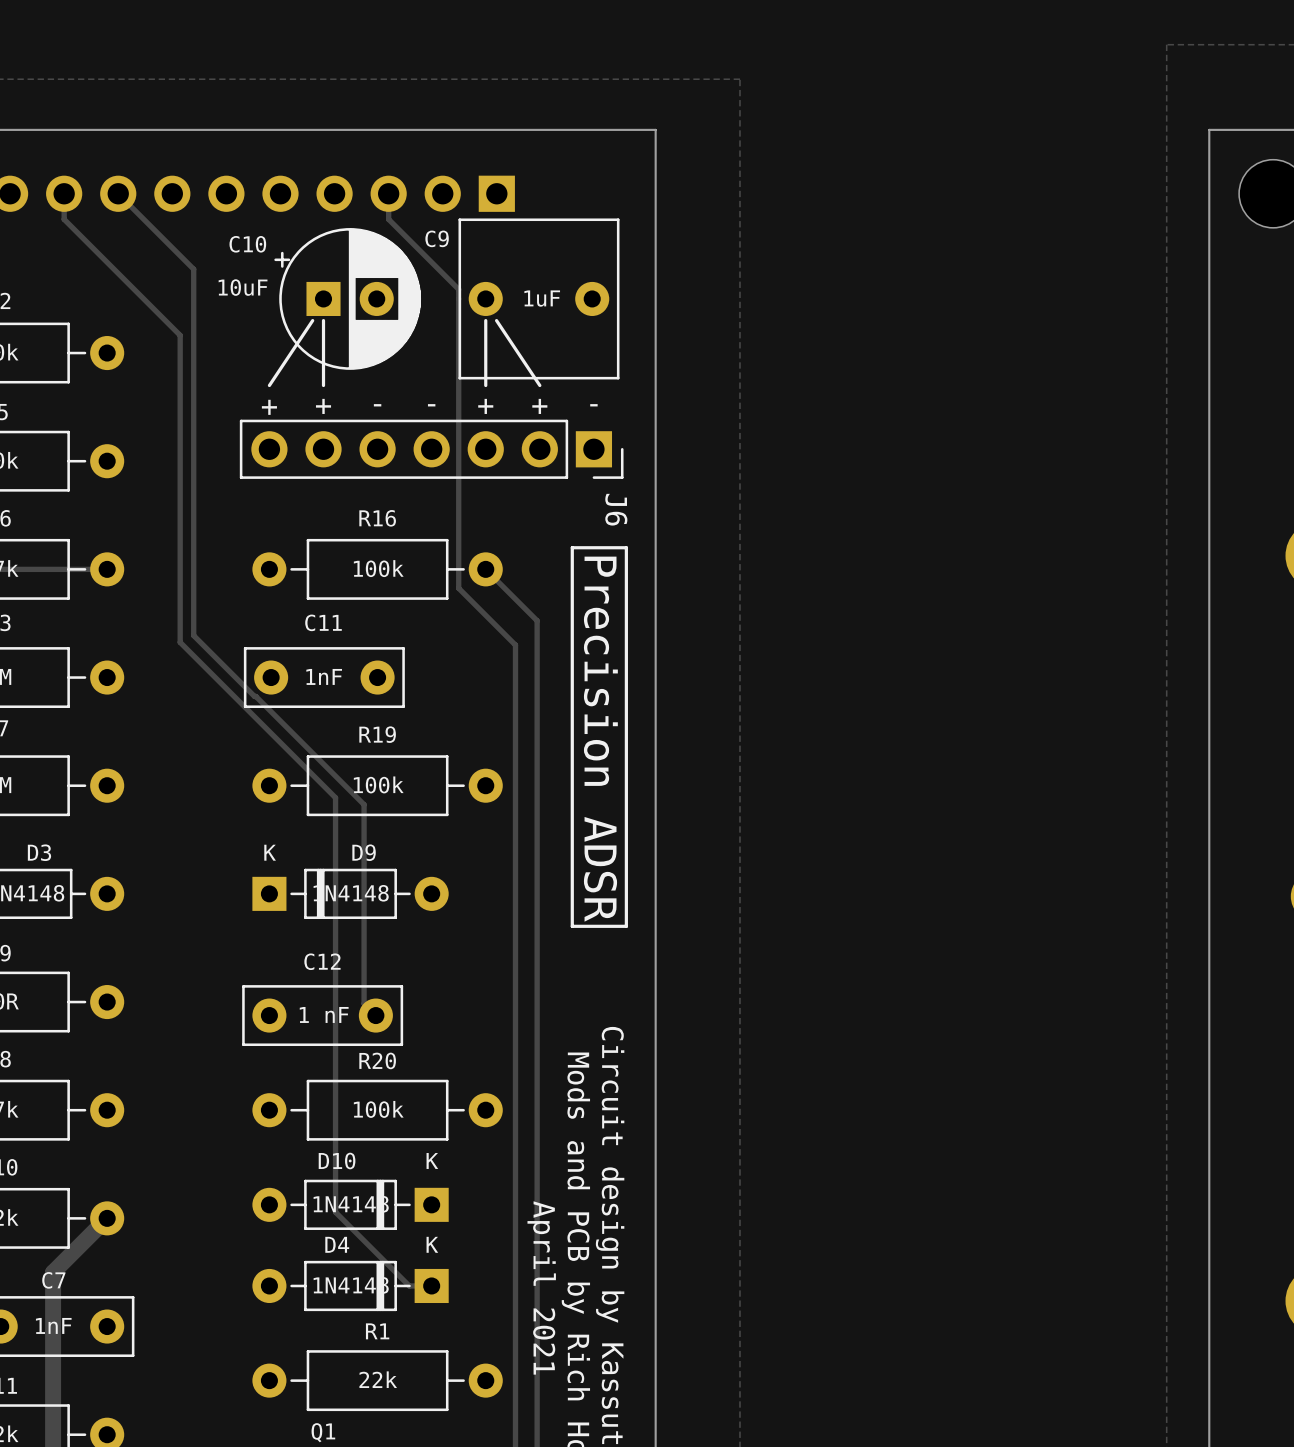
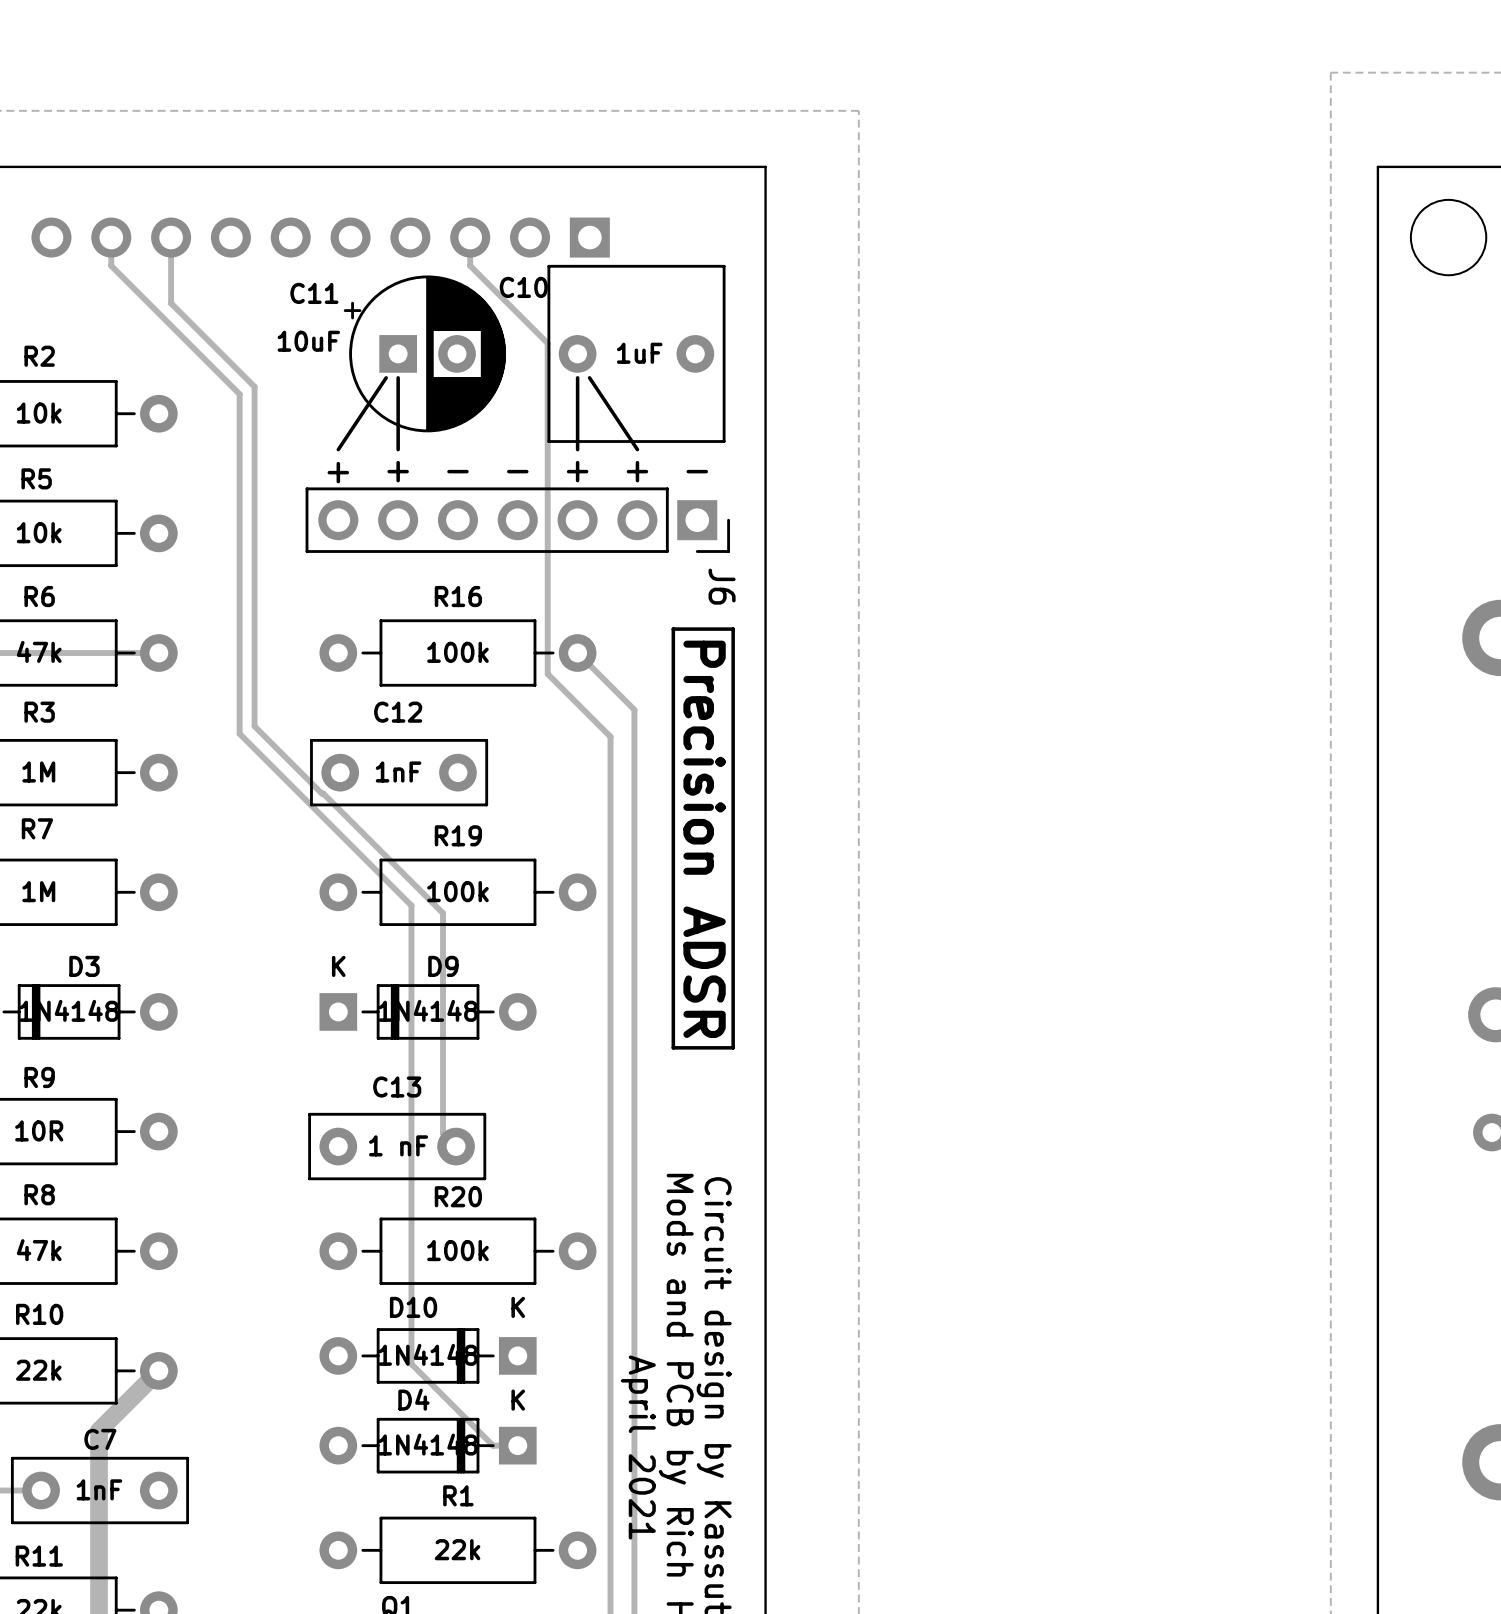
track: (118, 193) (193, 269) (193, 328) -> (171, 237) (171, 303) (254, 386)
C9 name: C9 (437, 238) -> C10 (523, 287)
C10 name: C10 (247, 244) -> C11 (314, 293)
C11 name: C11 (323, 622) -> C12 (398, 712)
C12 name: C12 (322, 961) -> C13 (397, 1087)

